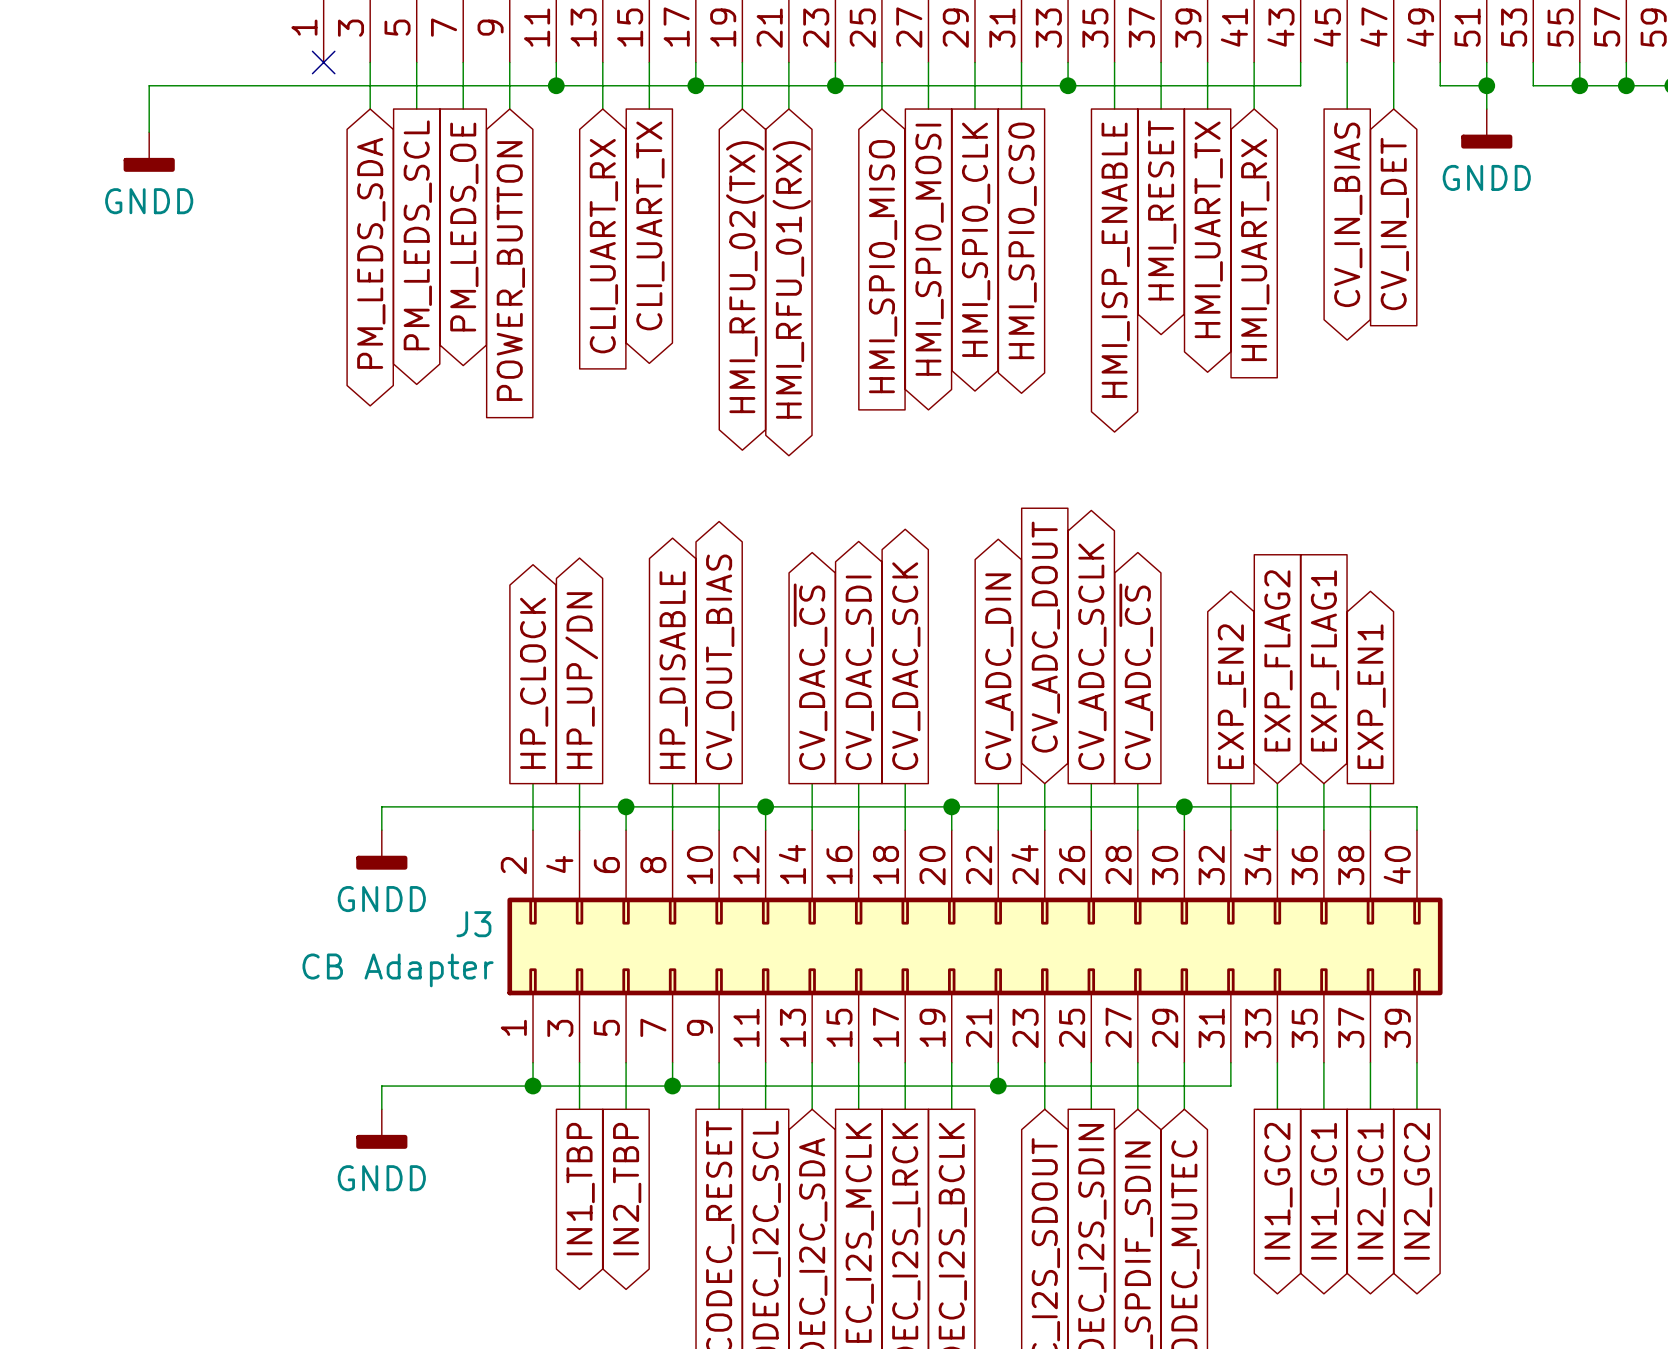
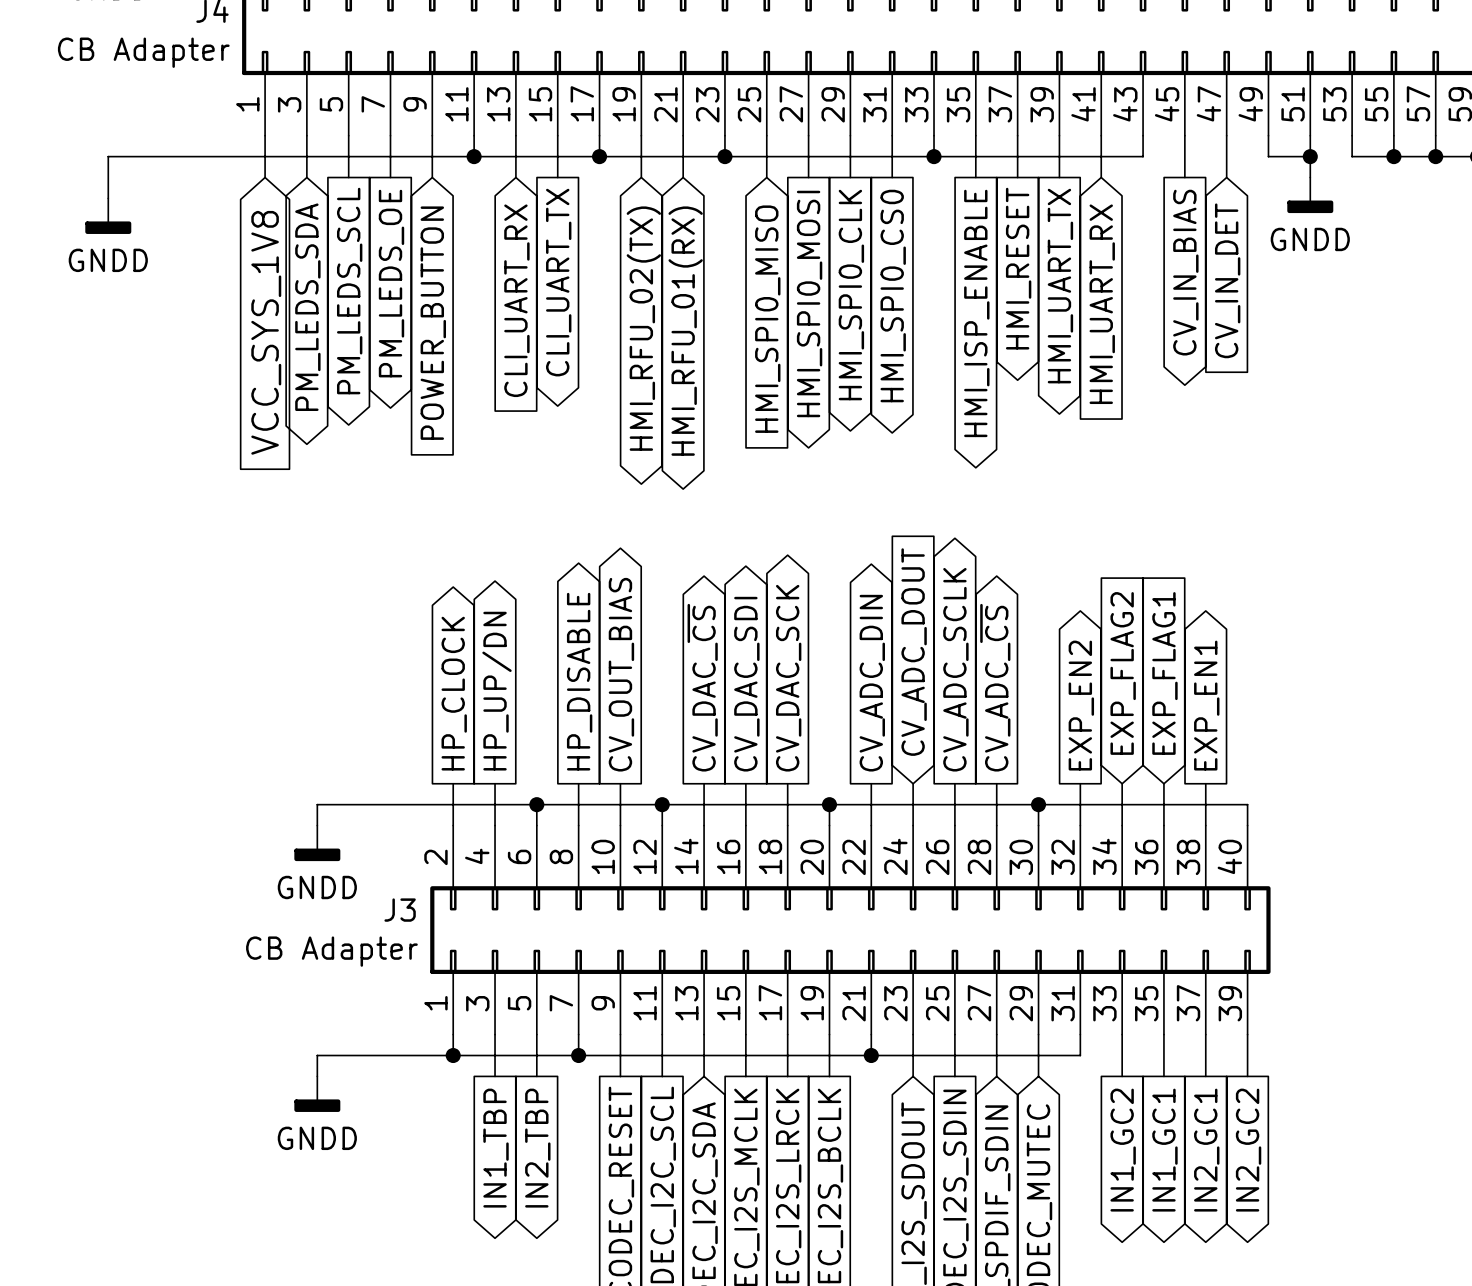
wire: none -> (265, 135) (265, 177)
no-connect mark: (323, 62) -> none
global label: none -> VCC_SYS_1V8 (266, 332)

